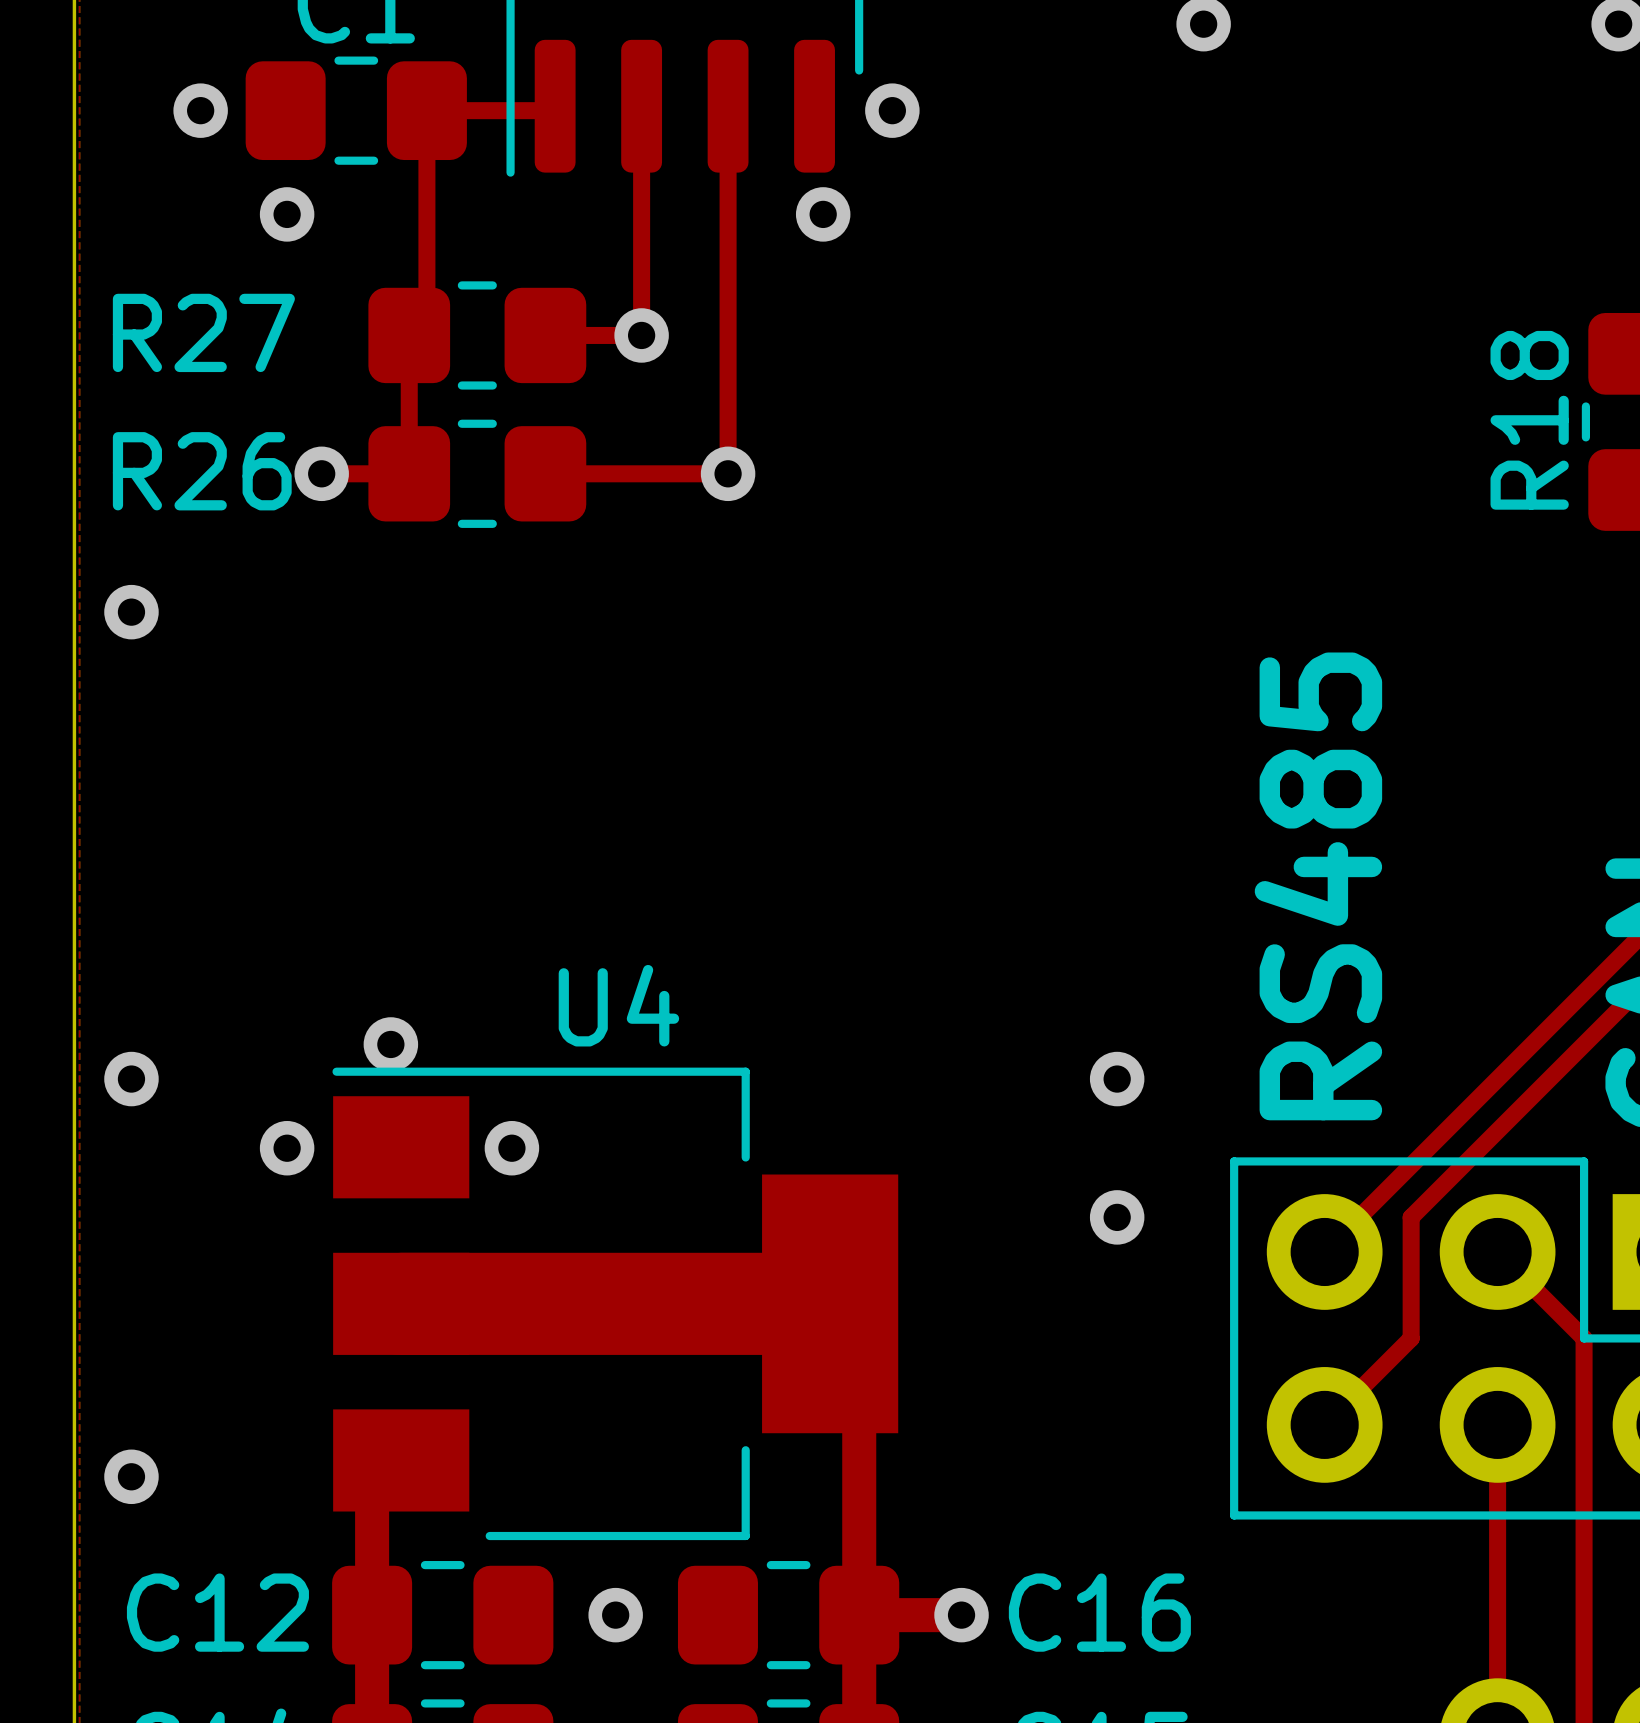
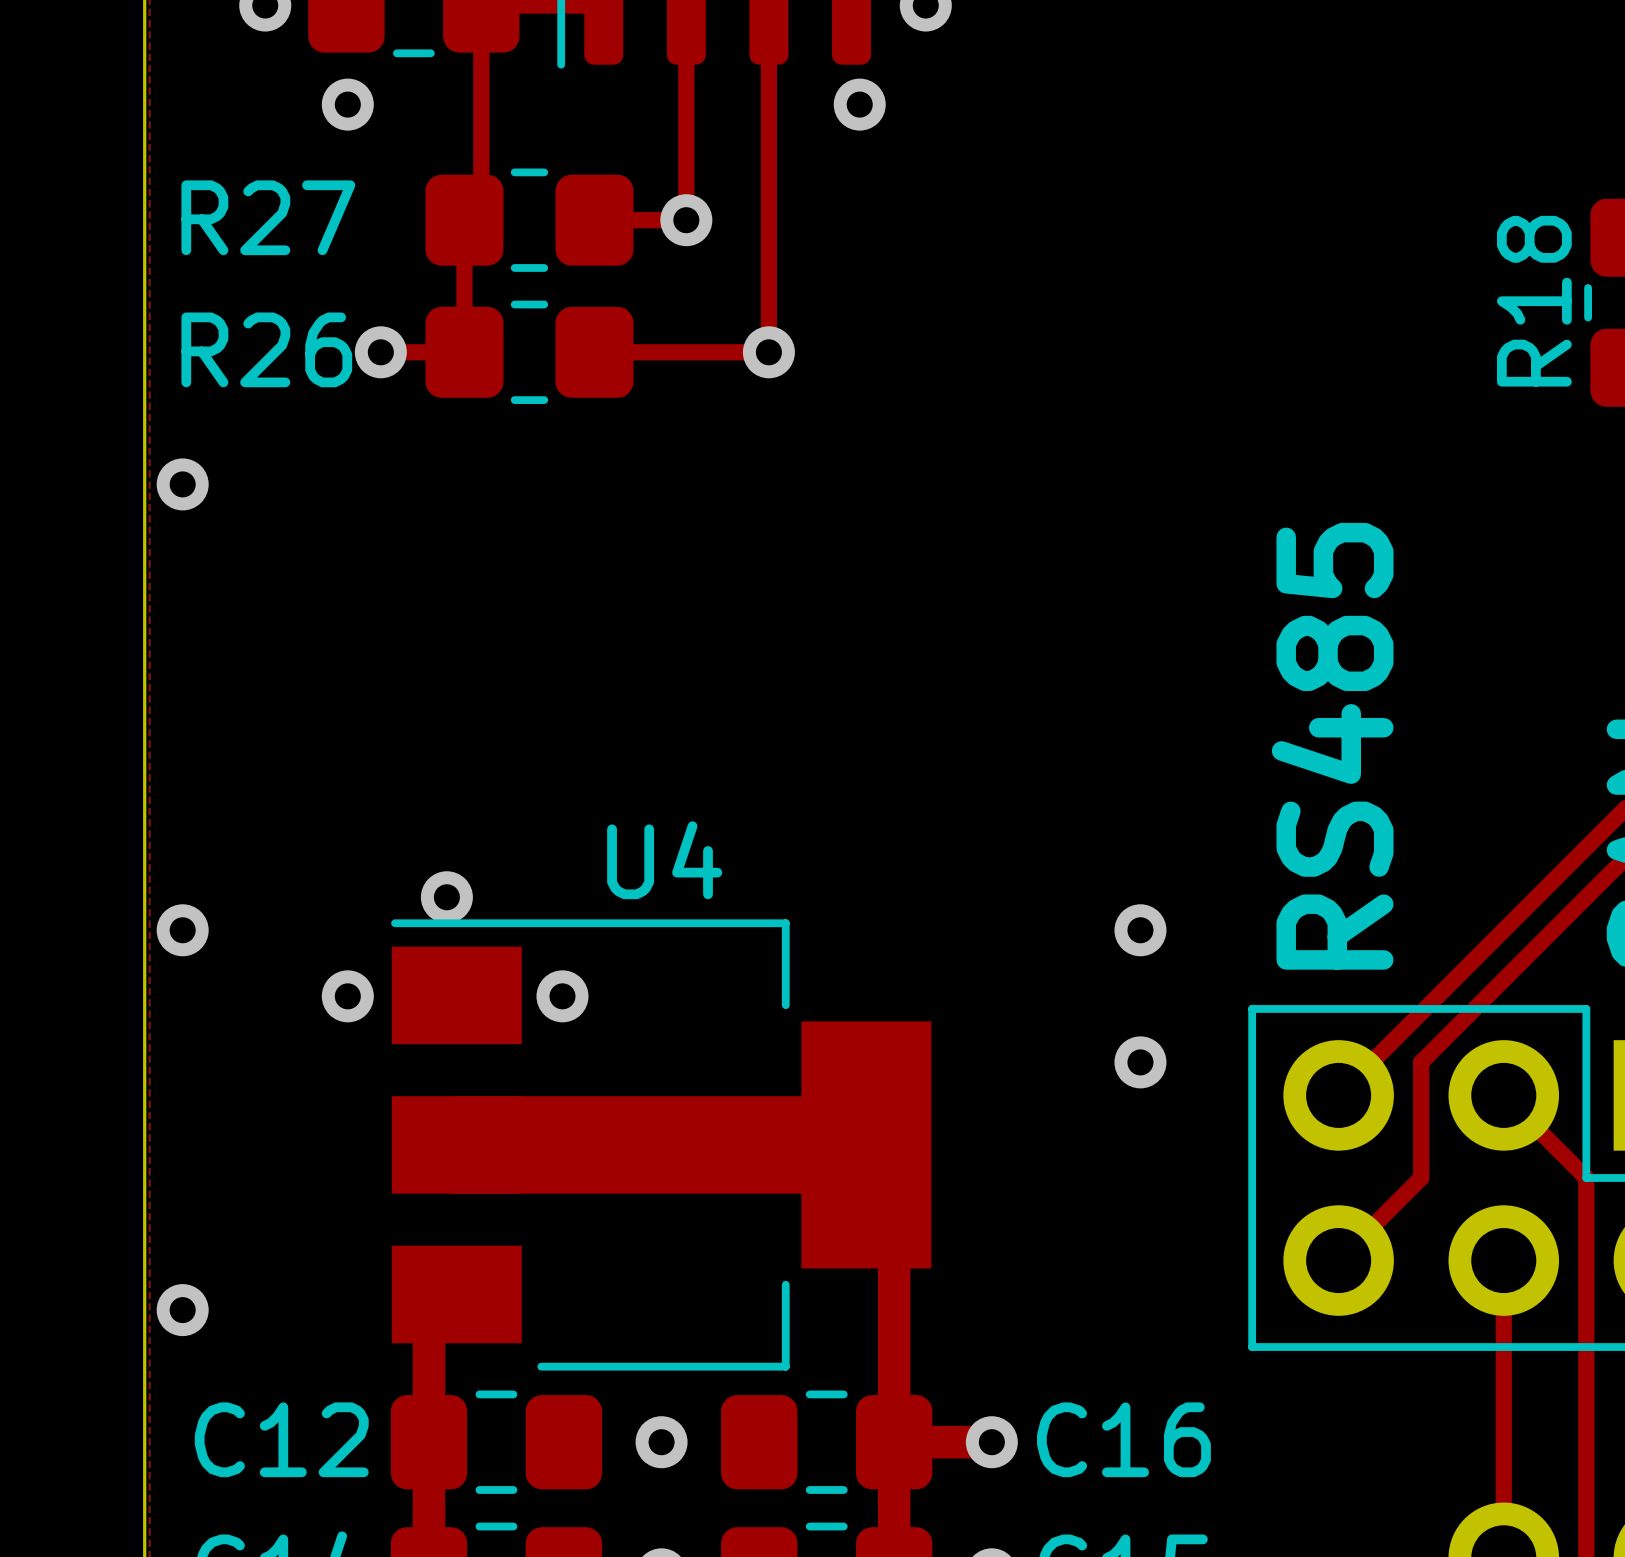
via position: (131, 612) -> (182, 484)
via position: (131, 1079) -> (182, 930)
via position: (131, 1476) -> (182, 1310)

